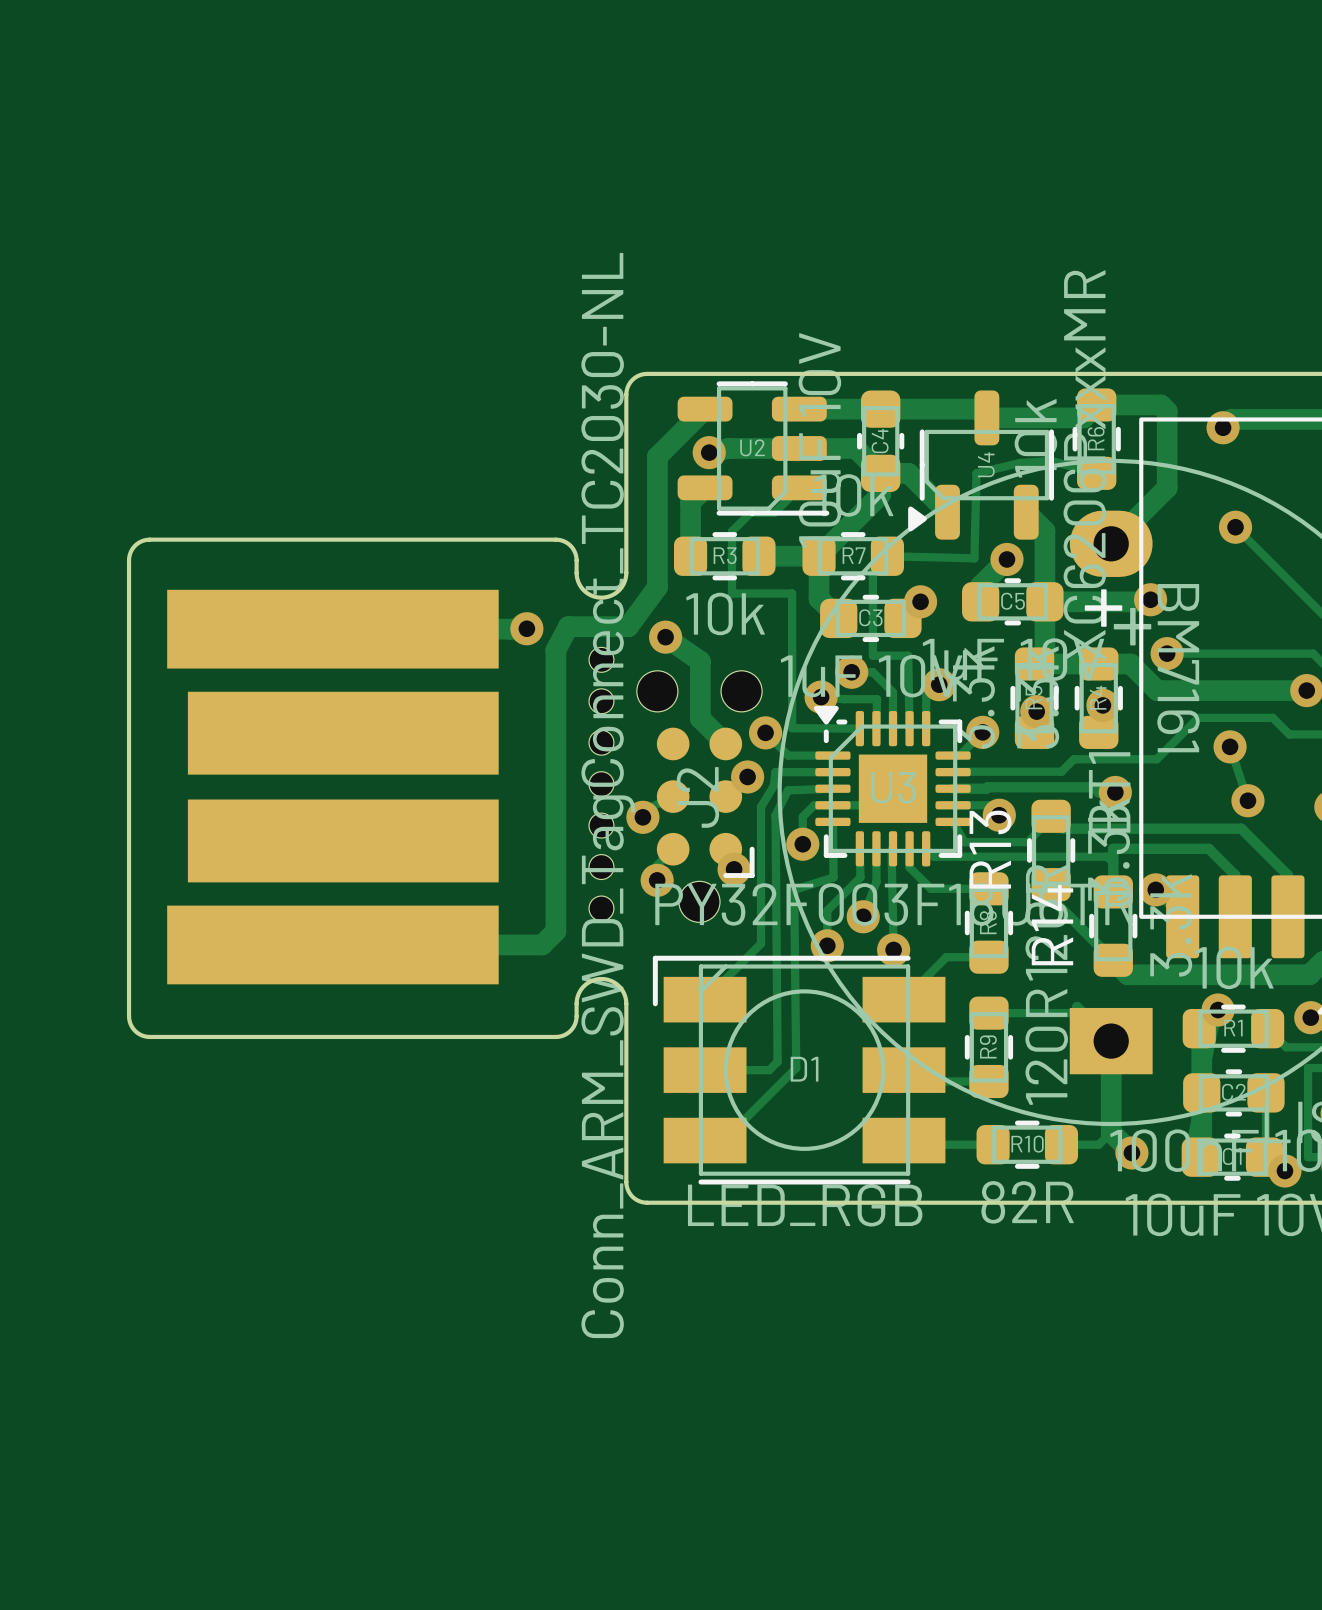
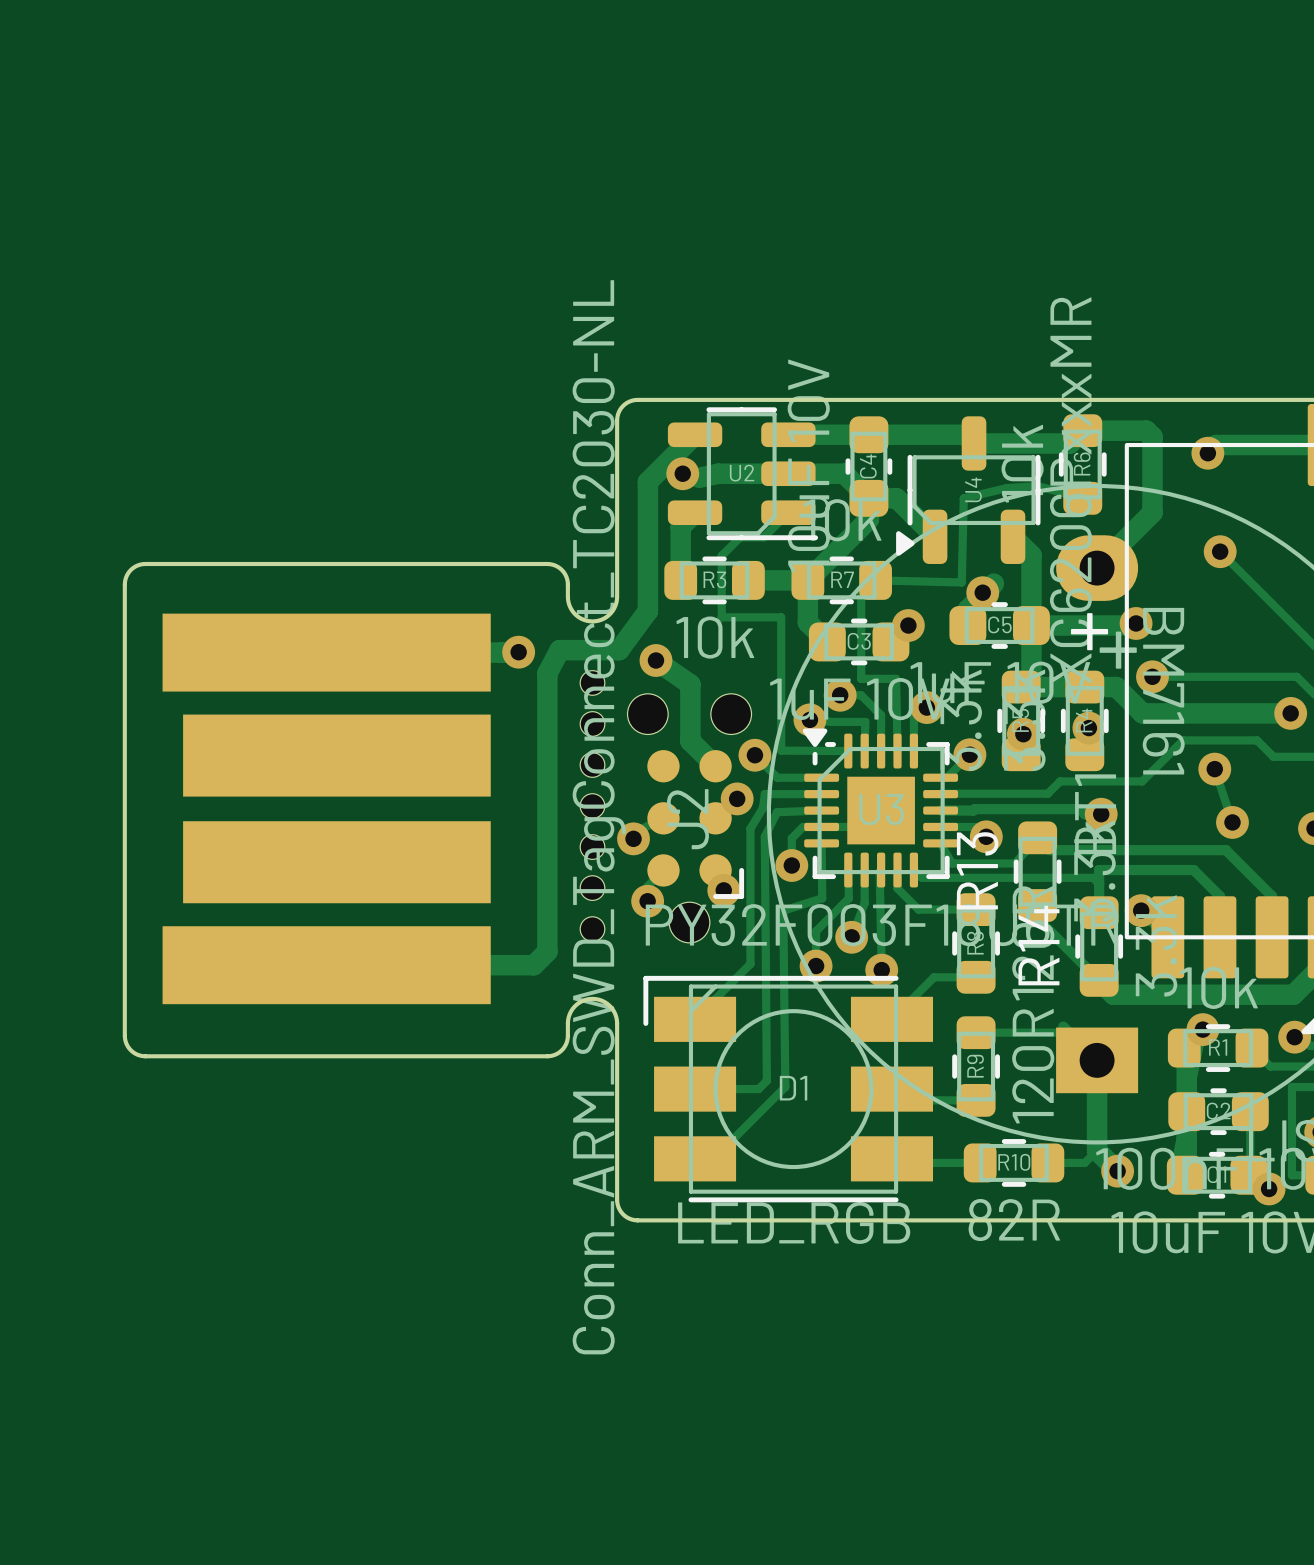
via position: (709, 452) -> (682, 473)
via position: (1006, 559) -> (982, 592)

